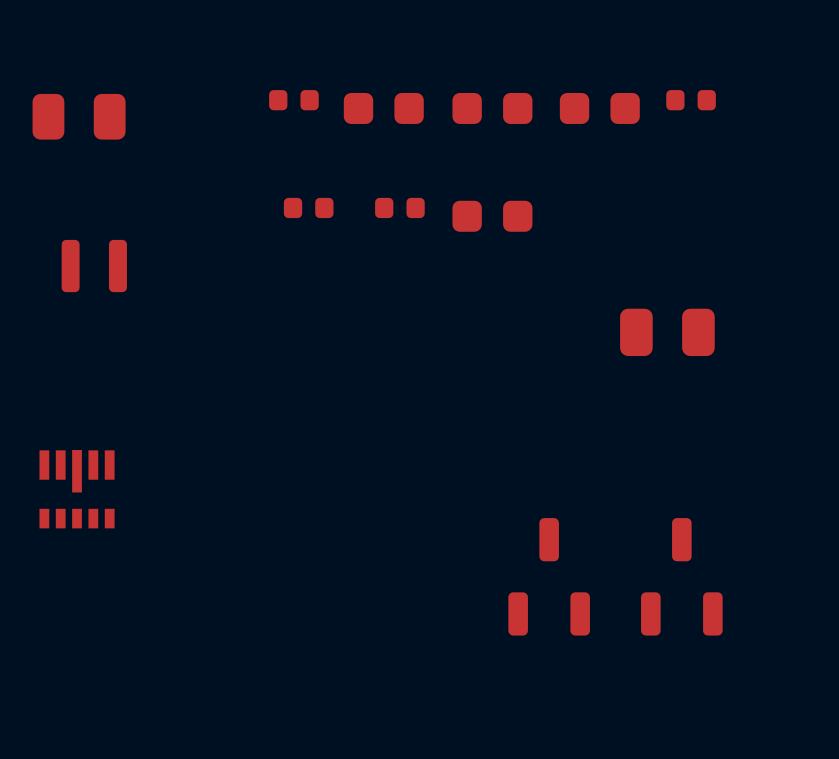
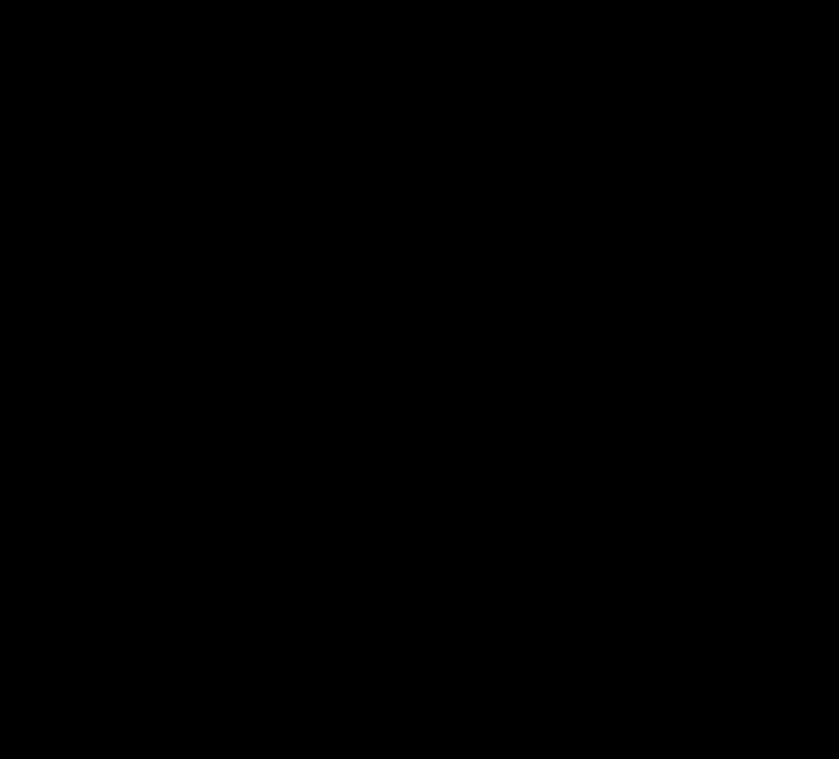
part: (293, 100) -> none
part: (691, 100) -> none
part: (383, 108) -> none
part: (492, 108) -> none
part: (599, 108) -> none
part: (79, 116) -> none
part: (308, 207) -> none
part: (399, 207) -> none
part: (492, 216) -> none
part: (94, 266) -> none
part: (667, 332) -> none
part: (77, 489) -> none
part: (549, 576) -> none
part: (681, 576) -> none

